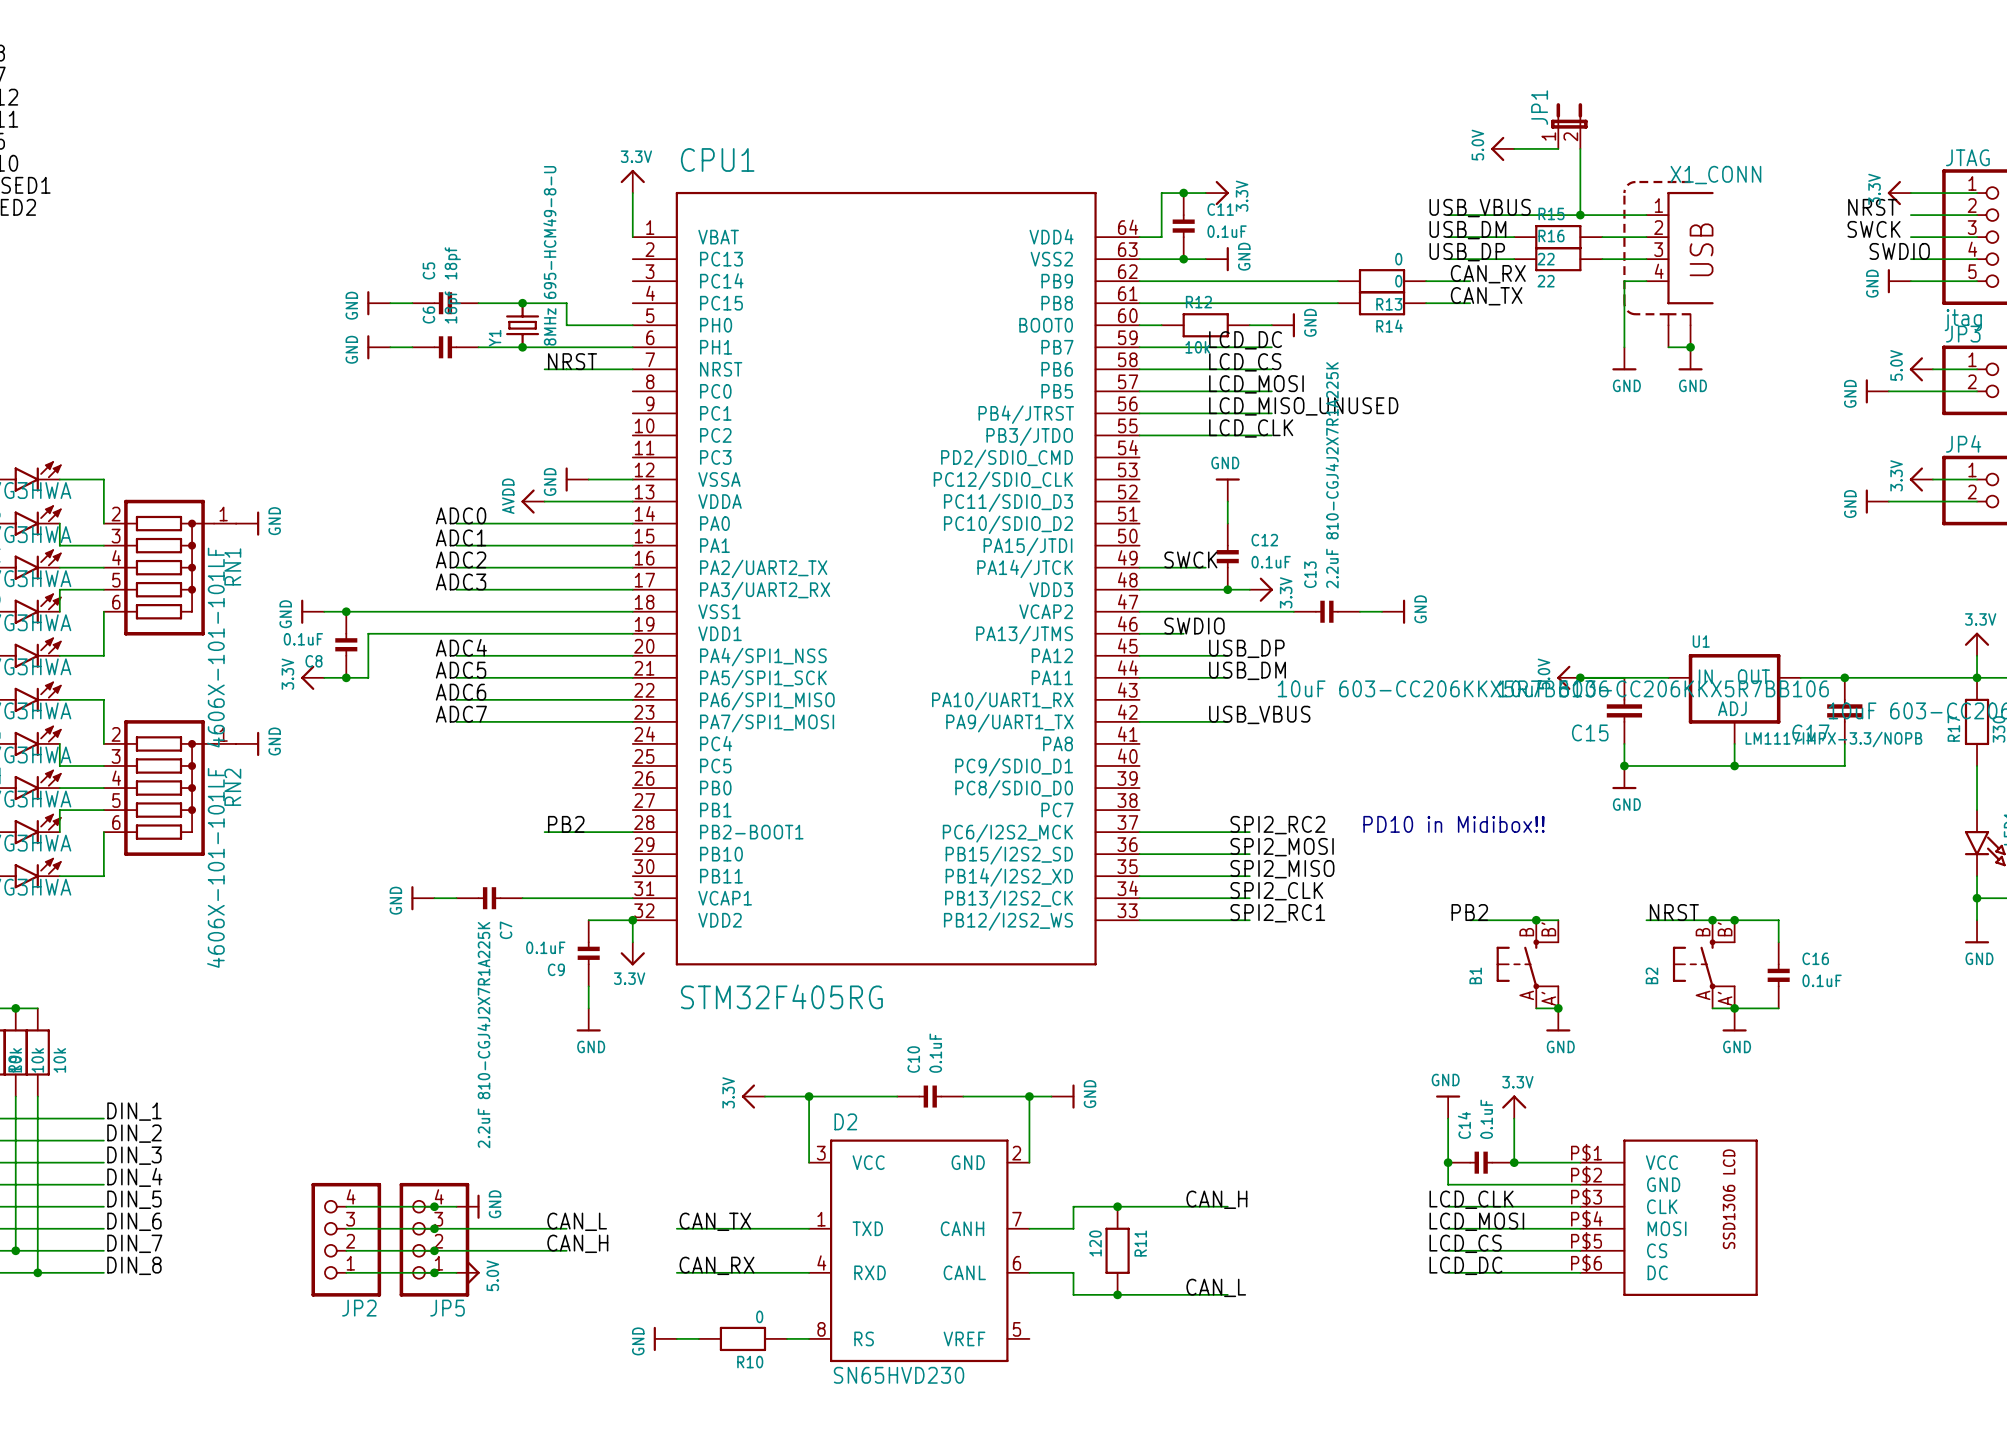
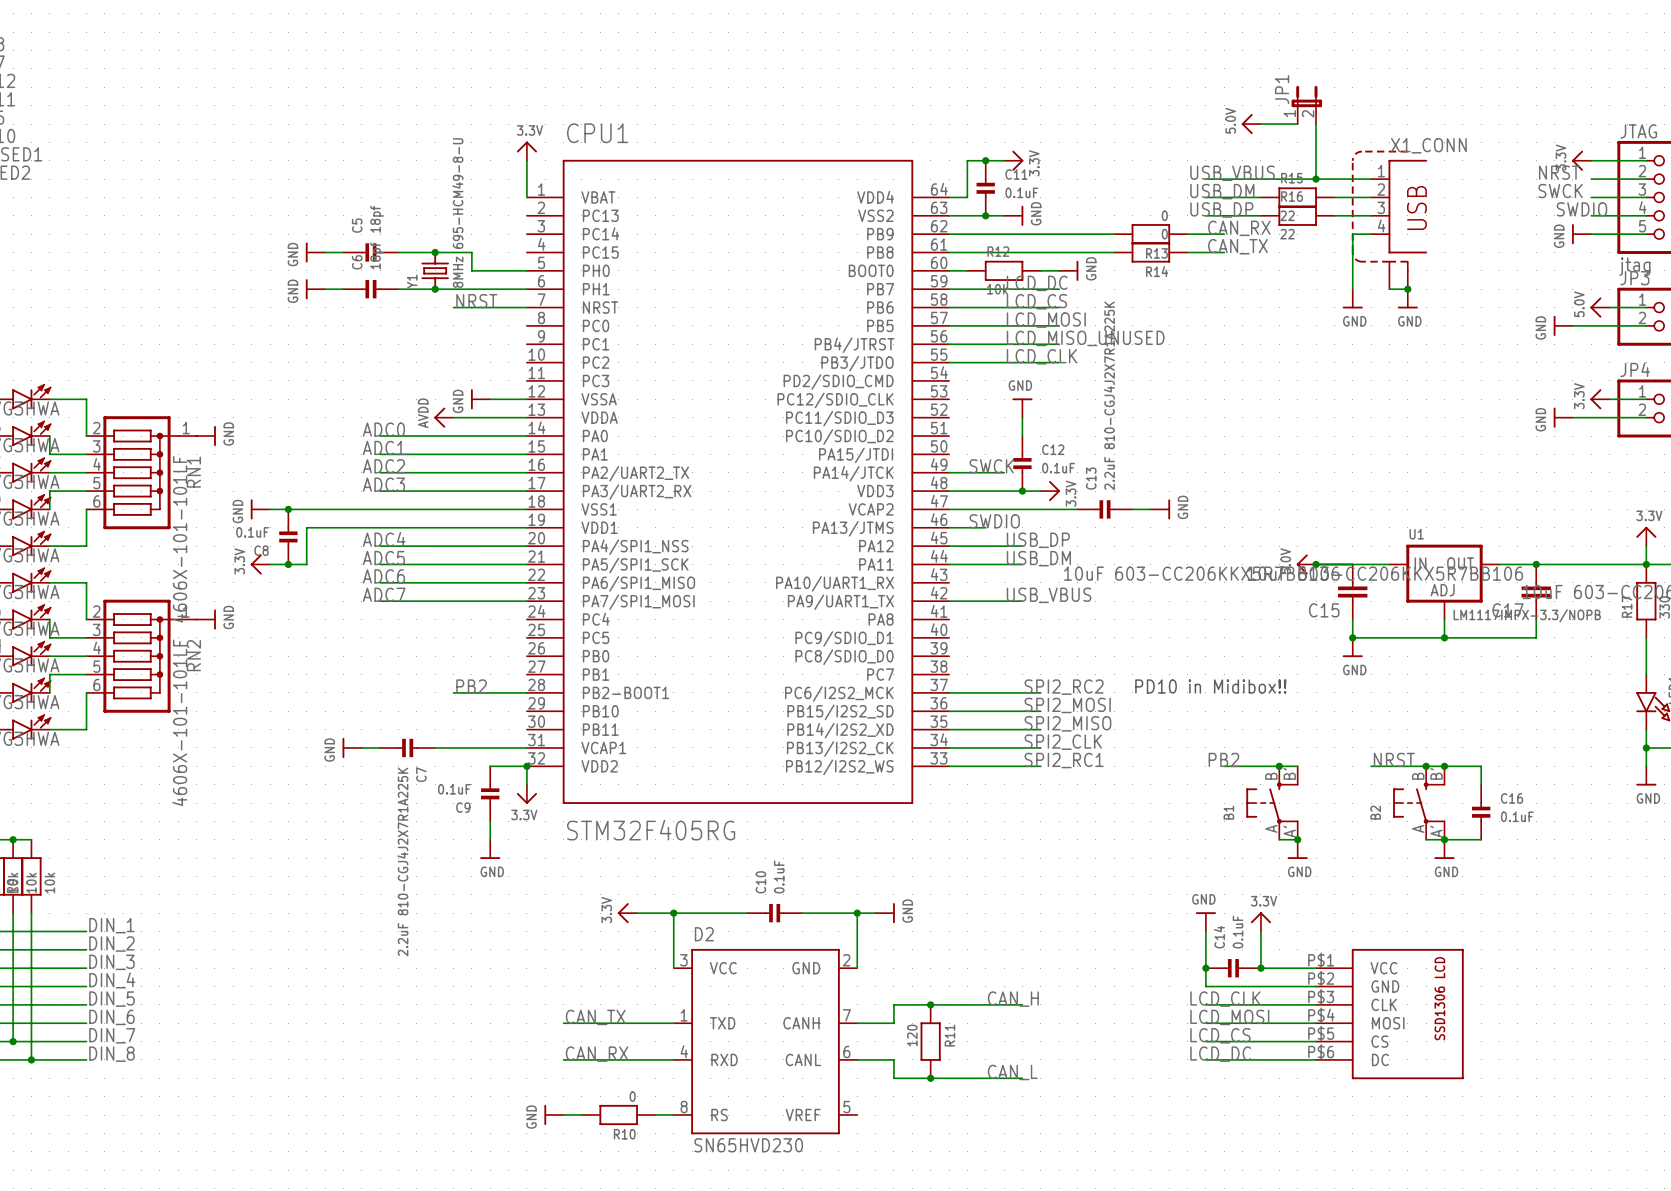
wire: (346, 1206) (456, 1206) -> none
junction: (434, 1206) -> none
power symbol: GND (468, 1206) -> none
label: CAN_L (577, 1221) -> none
wire: (346, 1228) (566, 1228) -> none
junction: (434, 1228) -> none
JP2: (346, 1239) -> none
JP5: (434, 1239) -> none
label: CAN_H (577, 1243) -> none
wire: (346, 1250) (566, 1250) -> none
junction: (434, 1250) -> none
wire: (346, 1272) (456, 1272) -> none
junction: (434, 1272) -> none
power symbol: 5.0V (468, 1272) -> none

